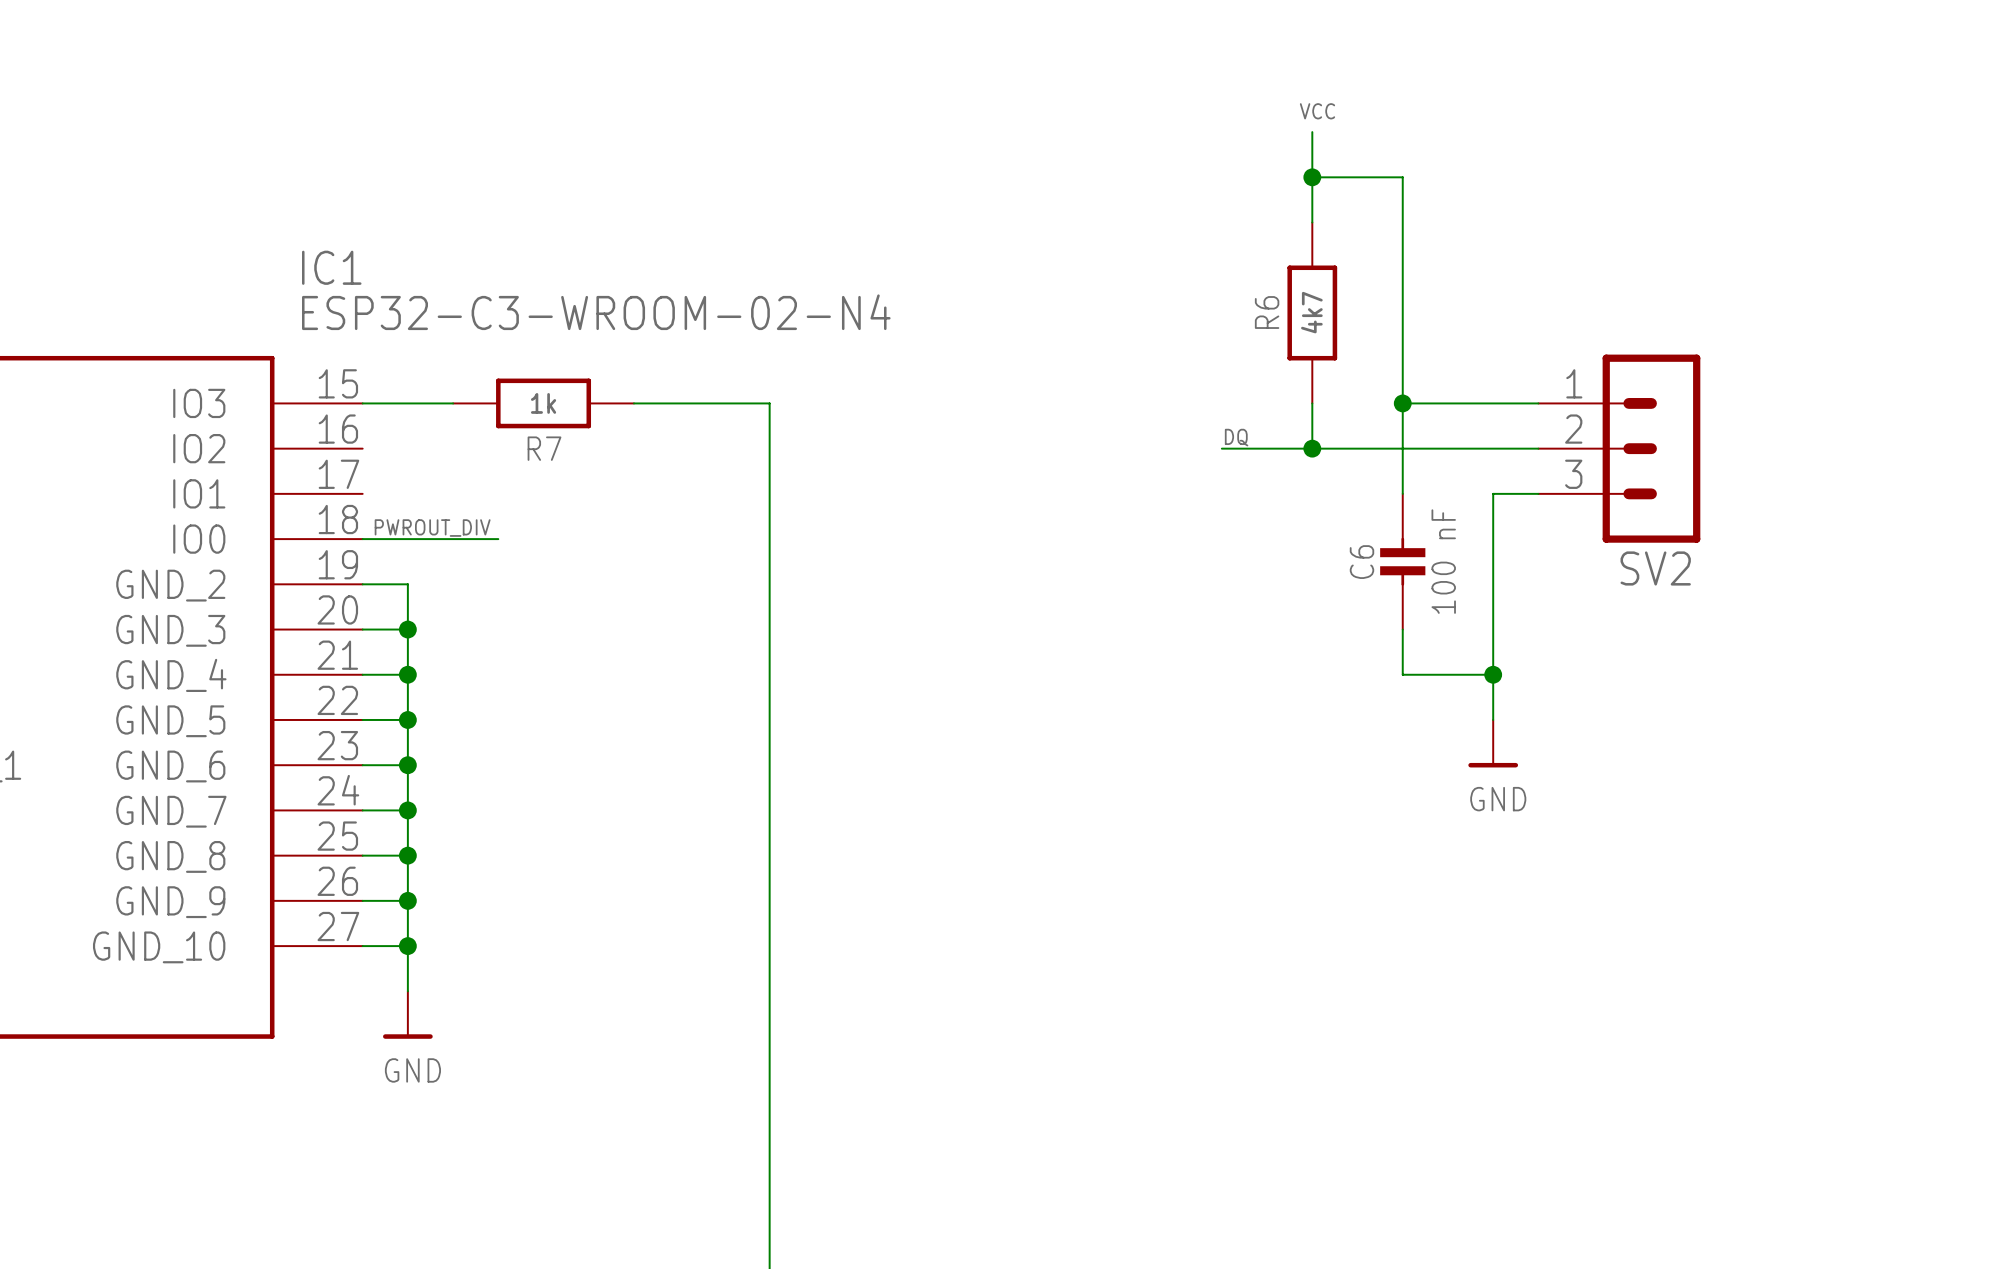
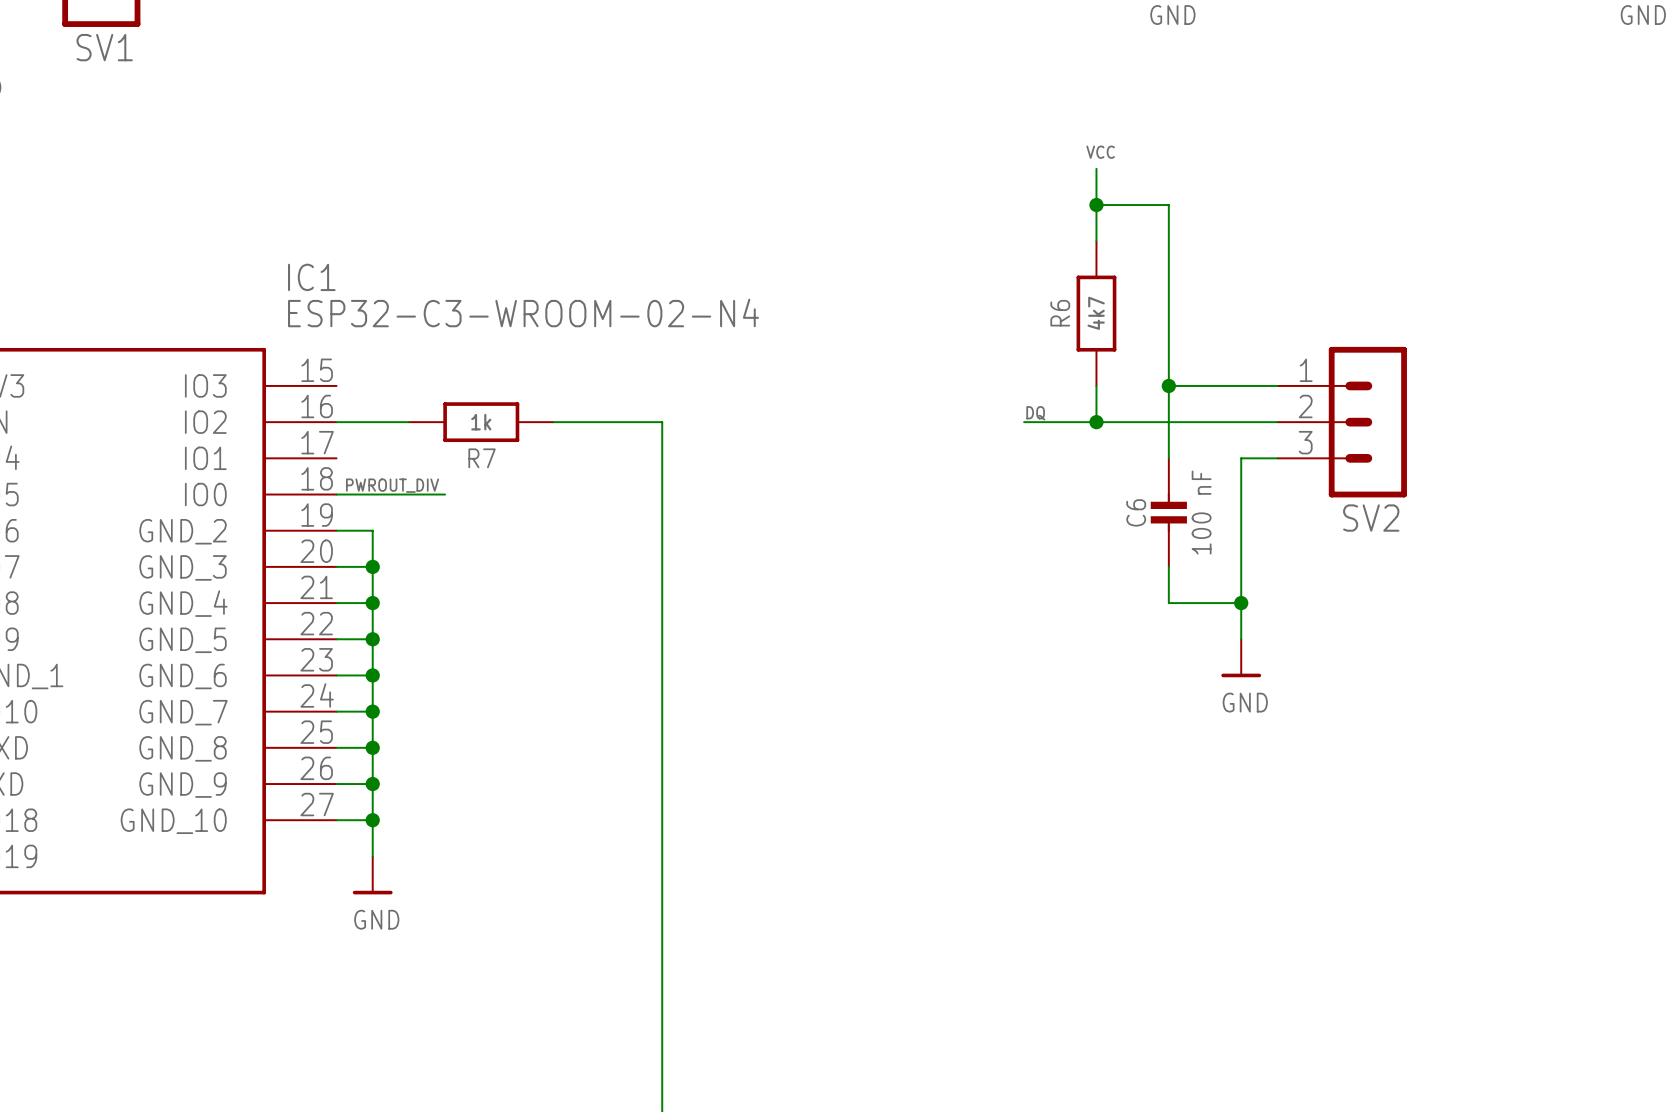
wire: (362, 403) (453, 403) -> (336, 422) (408, 422)
R7 position: (543, 403) -> (481, 422)
wire: (633, 403) (769, 403) (769, 448) -> (553, 422) (662, 422)

